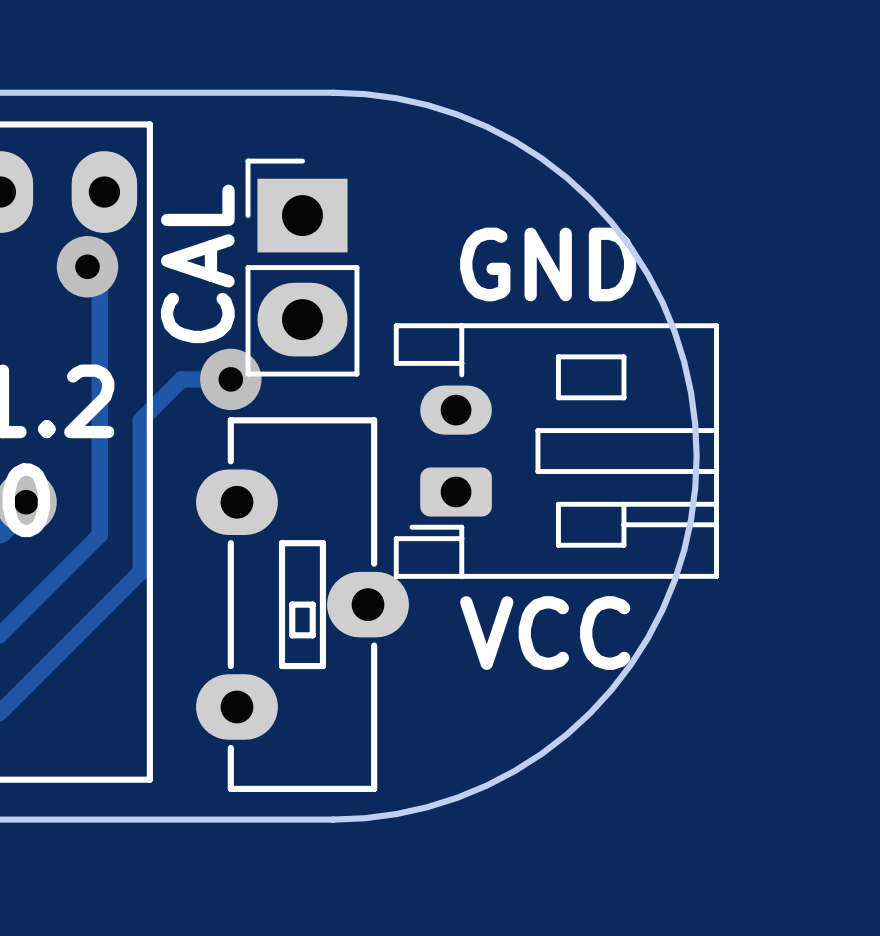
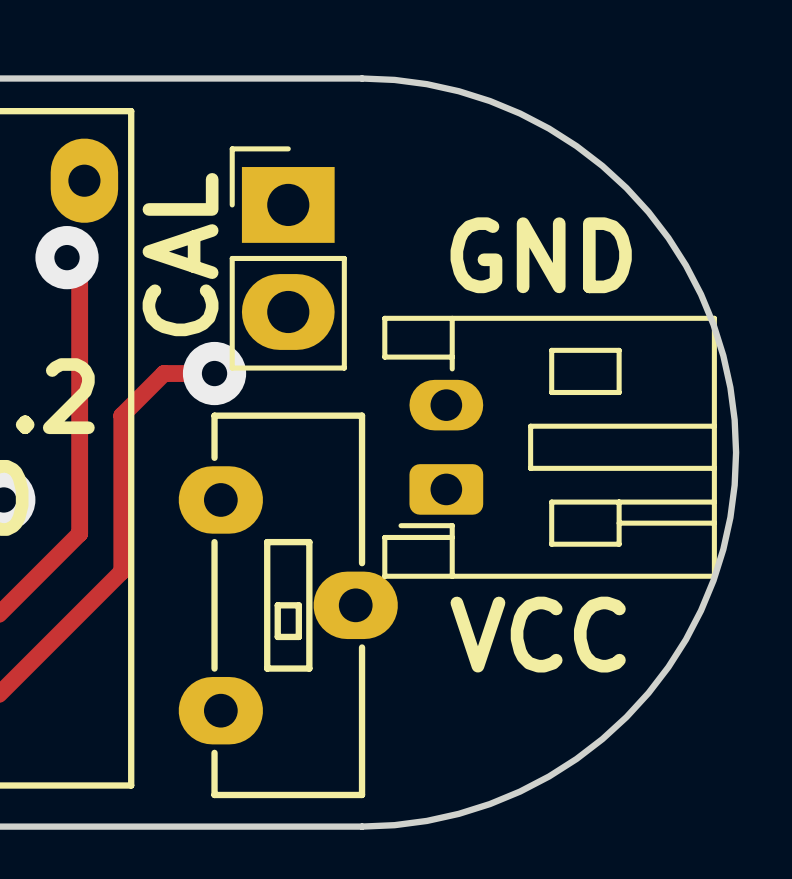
board edge: (333, 92) (396, 98) (457, 114) (514, 141) (541, 158) (590, 199) (630, 247) (662, 302) (684, 362) (695, 424) (696, 456) (695, 487) (684, 550) (662, 609) (630, 664) (590, 713) (541, 753) (514, 770) (457, 797) (396, 814) (333, 819) -> (319, 78) (394, 79) (458, 91) (489, 101) (549, 128) (602, 166) (626, 188) (668, 238) (701, 294) (723, 355) (734, 419) (736, 452) (734, 485) (723, 549) (701, 610) (668, 667) (626, 717) (602, 739) (549, 776) (489, 804) (458, 813) (394, 825) (319, 826)

